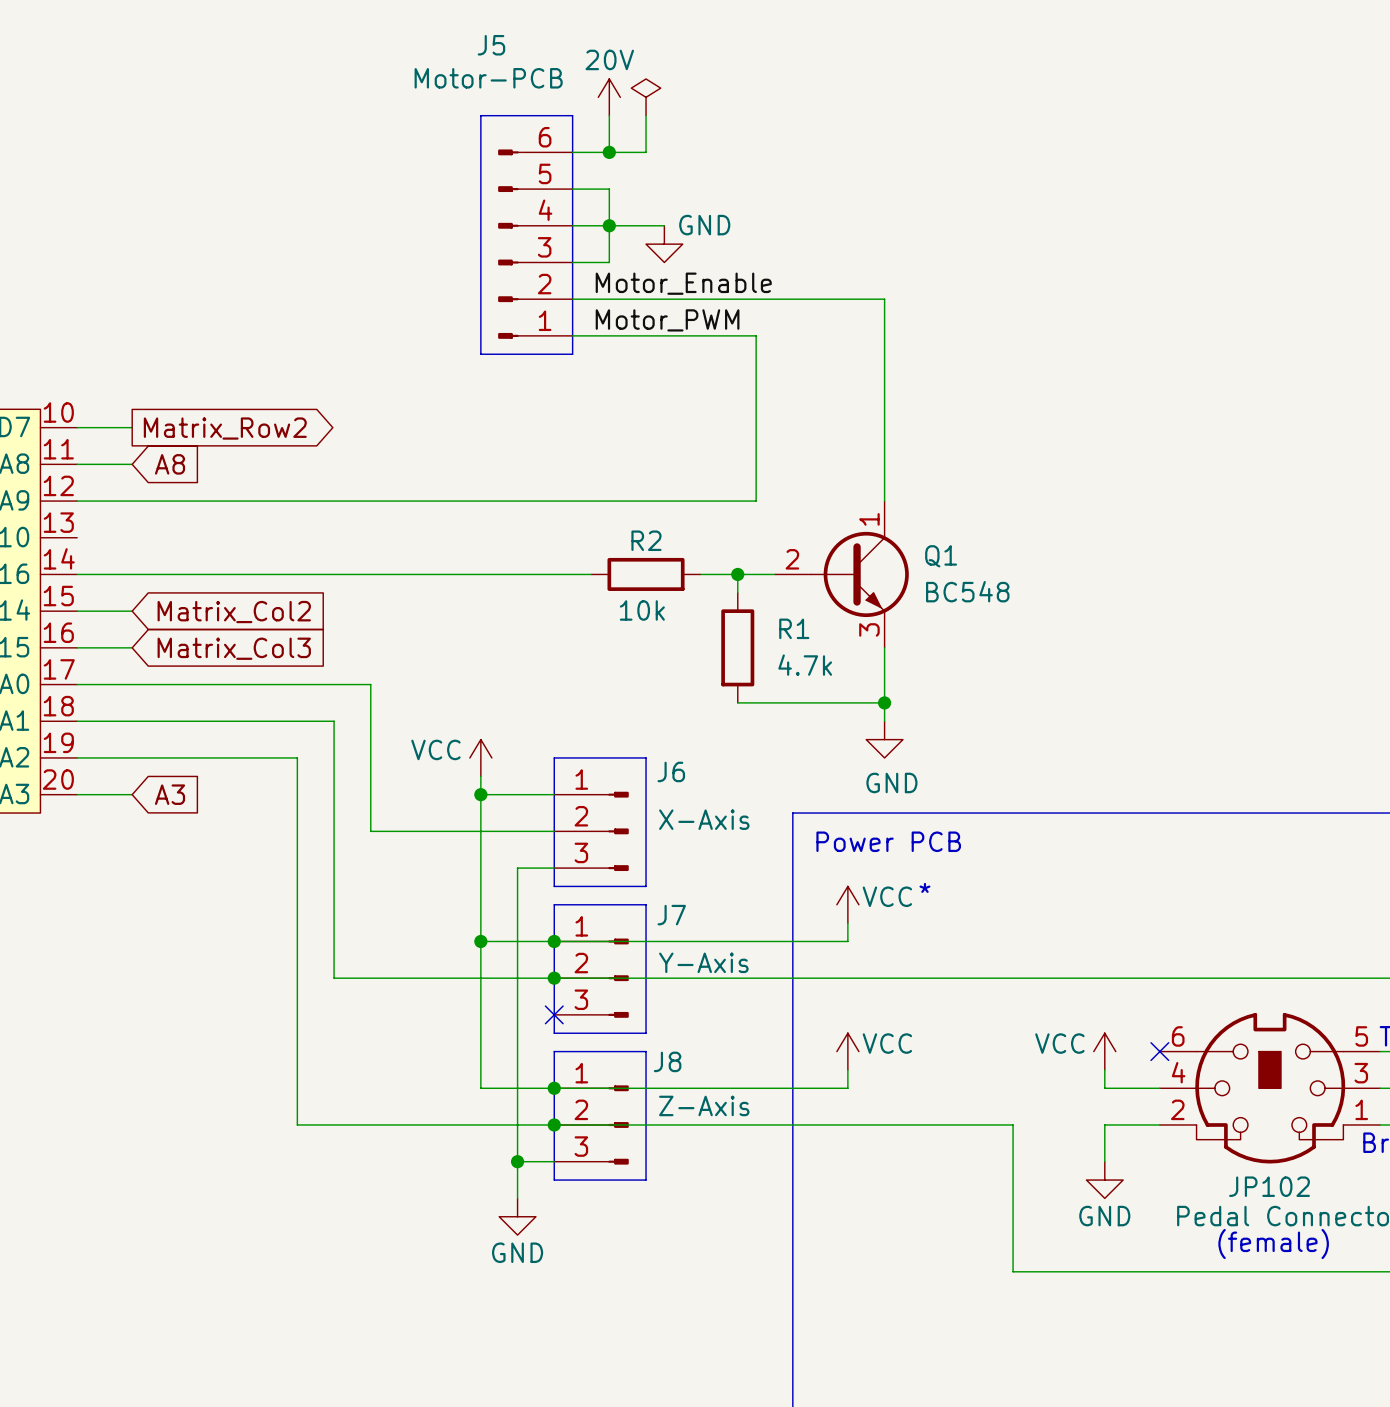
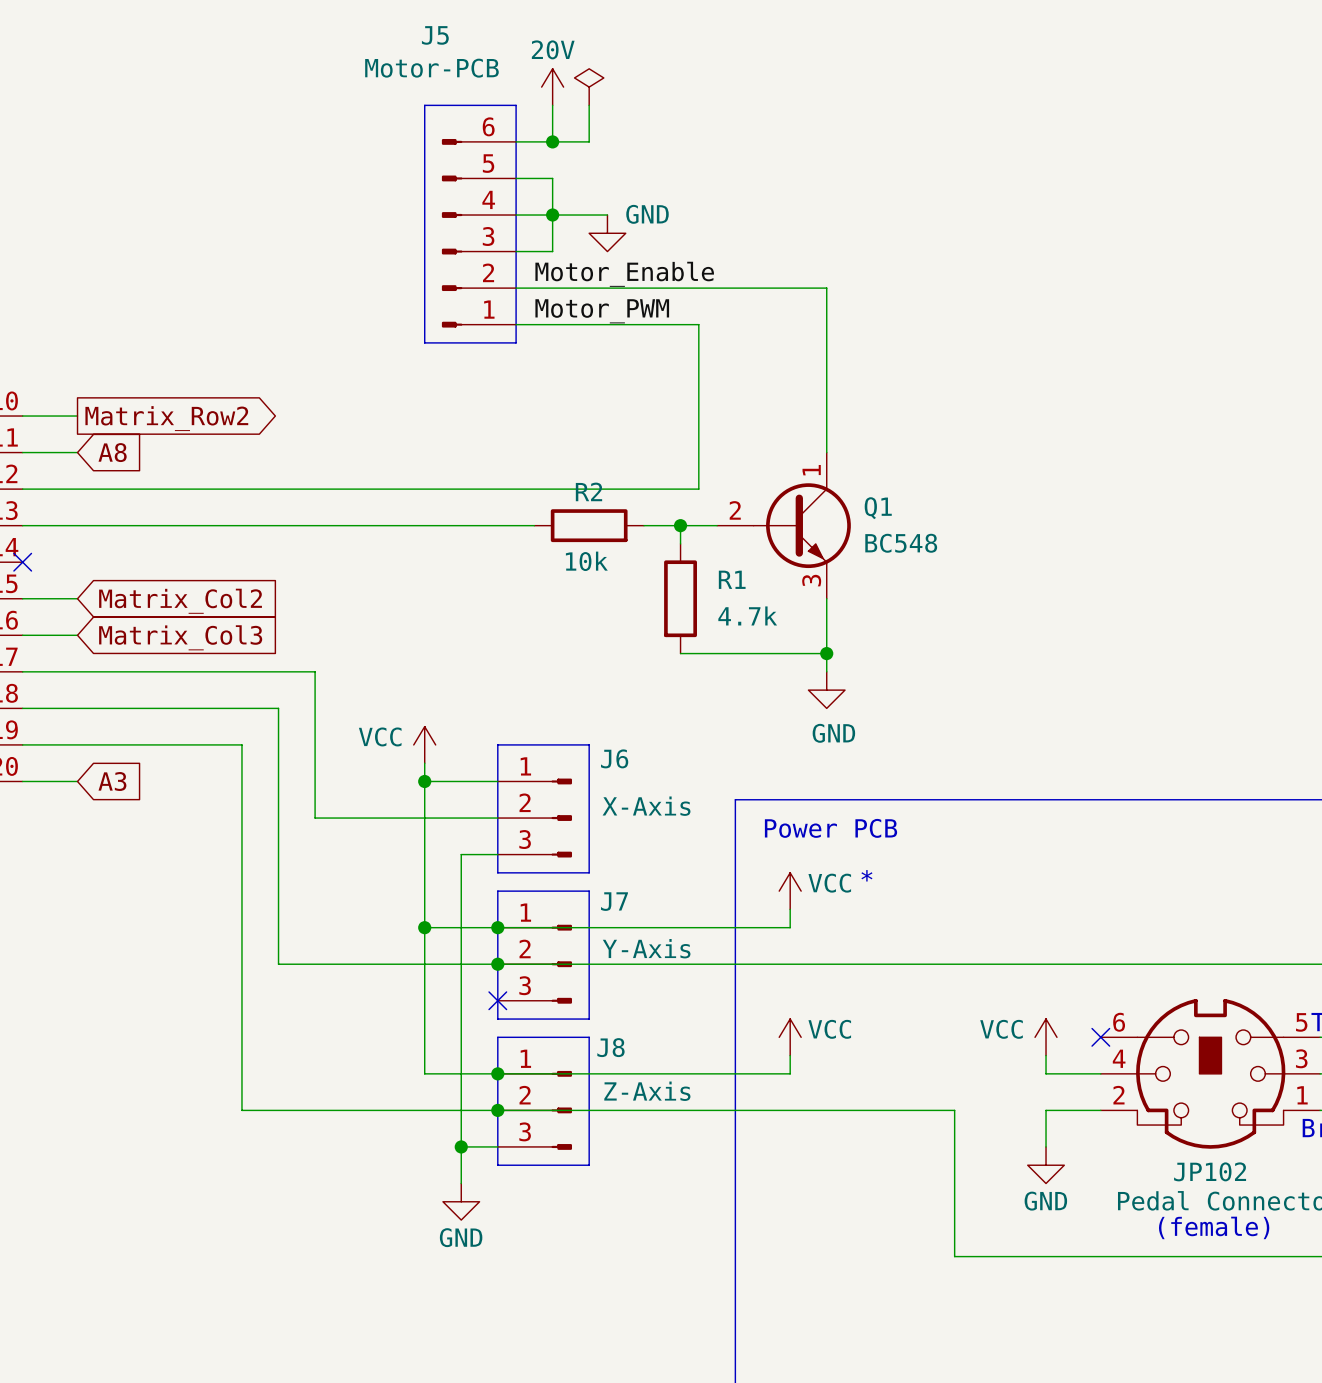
wire: (77, 574) (590, 574) -> (22, 525) (534, 525)
no-connect mark: none -> (22, 562)
R2 position: (646, 574) -> (589, 525)
wire: (701, 574) (774, 574) -> (644, 525) (717, 525)
wire: (737, 574) (737, 592) -> (680, 525) (680, 543)
junction position: (737, 574) -> (680, 525)
Q1 position: (841, 574) -> (783, 525)
R1 position: (737, 647) -> (680, 598)
wire: (737, 702) (884, 702) -> (680, 653) (826, 653)
junction position: (884, 702) -> (826, 653)
power symbol position: GND (884, 739) -> GND (826, 690)

